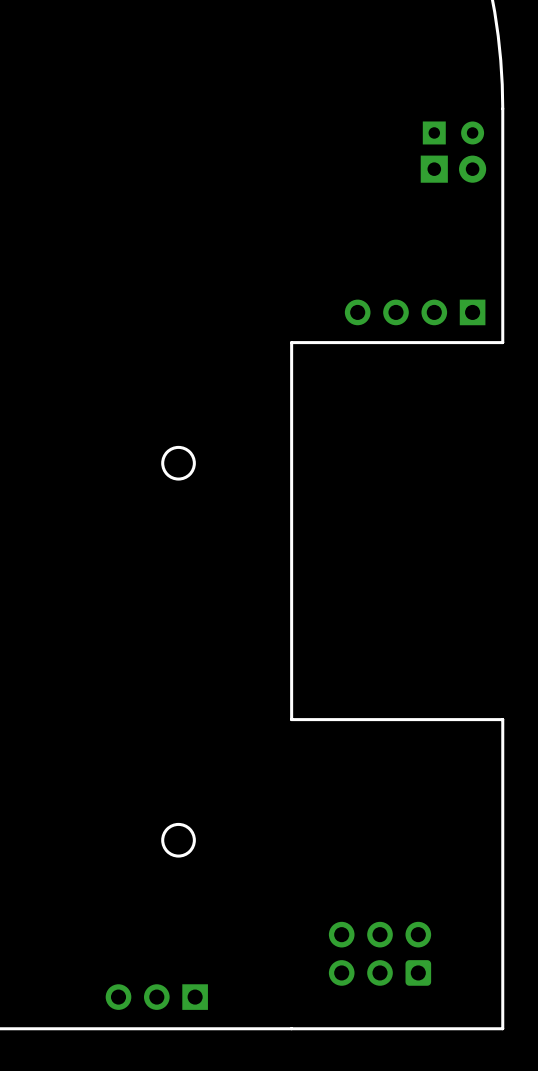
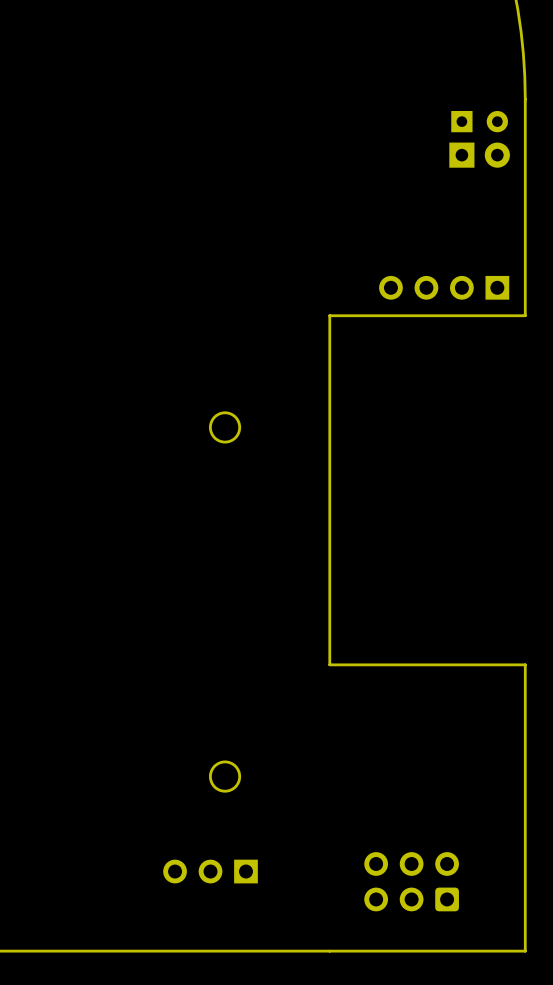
part position: (156, 997) -> (210, 871)

